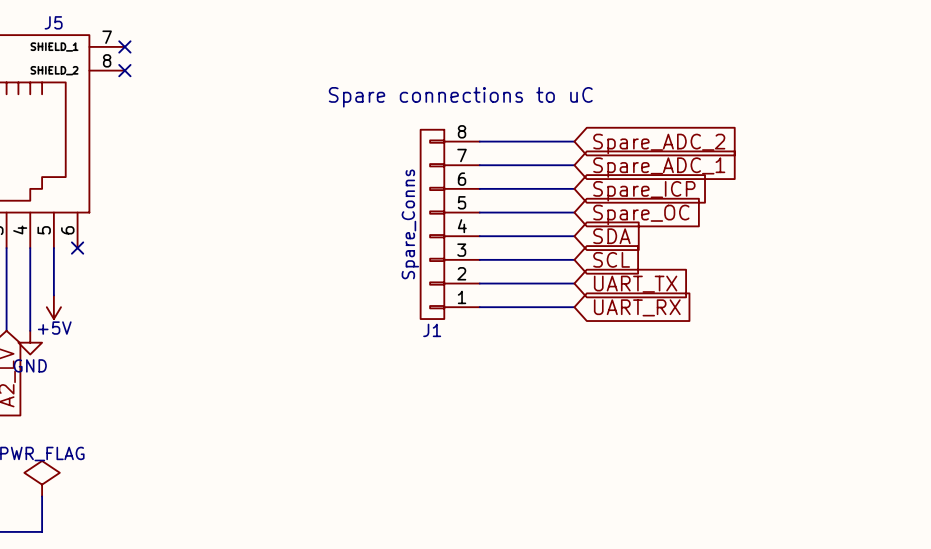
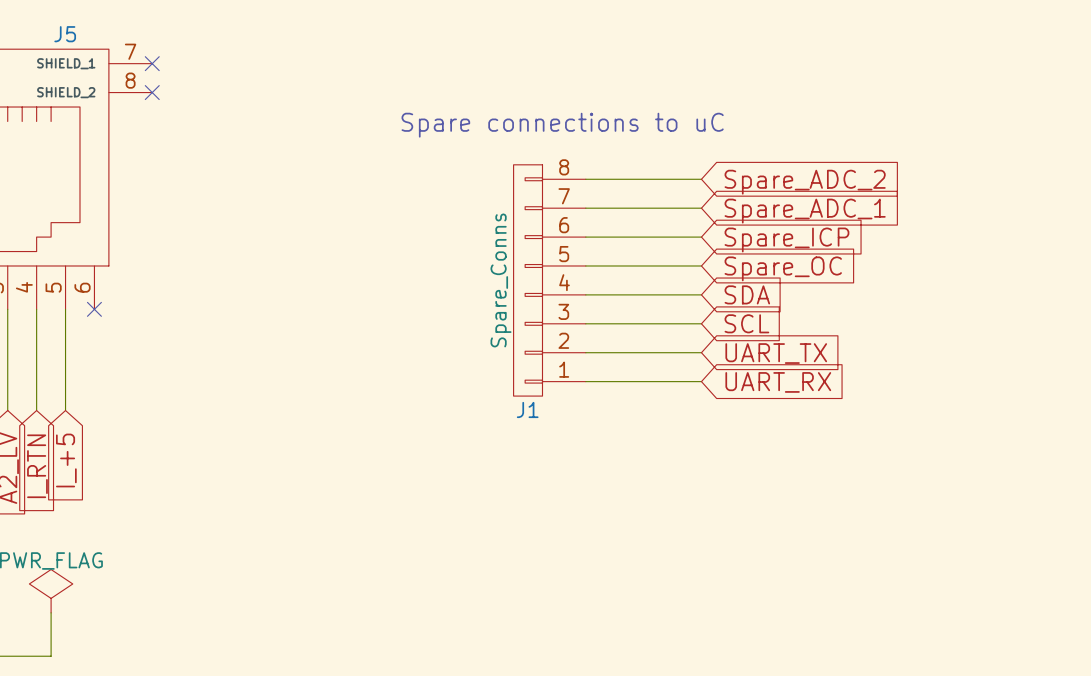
power symbol: +5V (53, 307) -> none
power symbol: GND (30, 342) -> none
global label: none -> I_+5 (66, 460)
global label: none -> I_RTN (37, 466)

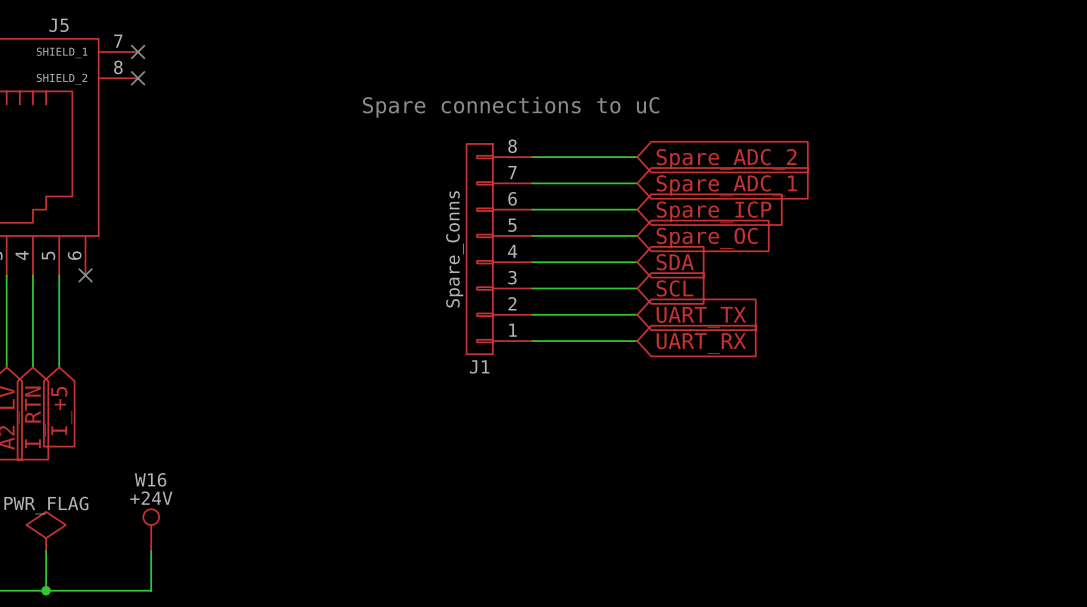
W16: none -> +24V (151, 530)
wire: none -> (151, 551) (151, 590) (46, 590)
junction: none -> (46, 590)

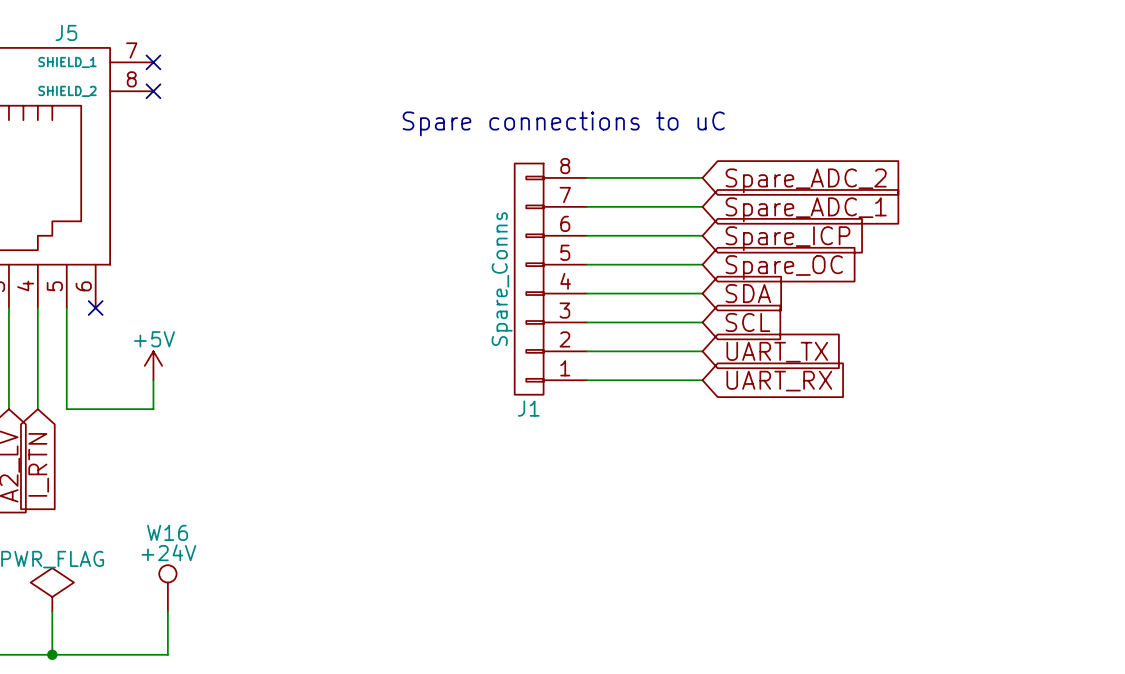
power symbol: none -> +5V (153, 365)
wire: none -> (153, 380) (153, 409) (66, 409)
global label: I_+5 (61, 410) -> none

